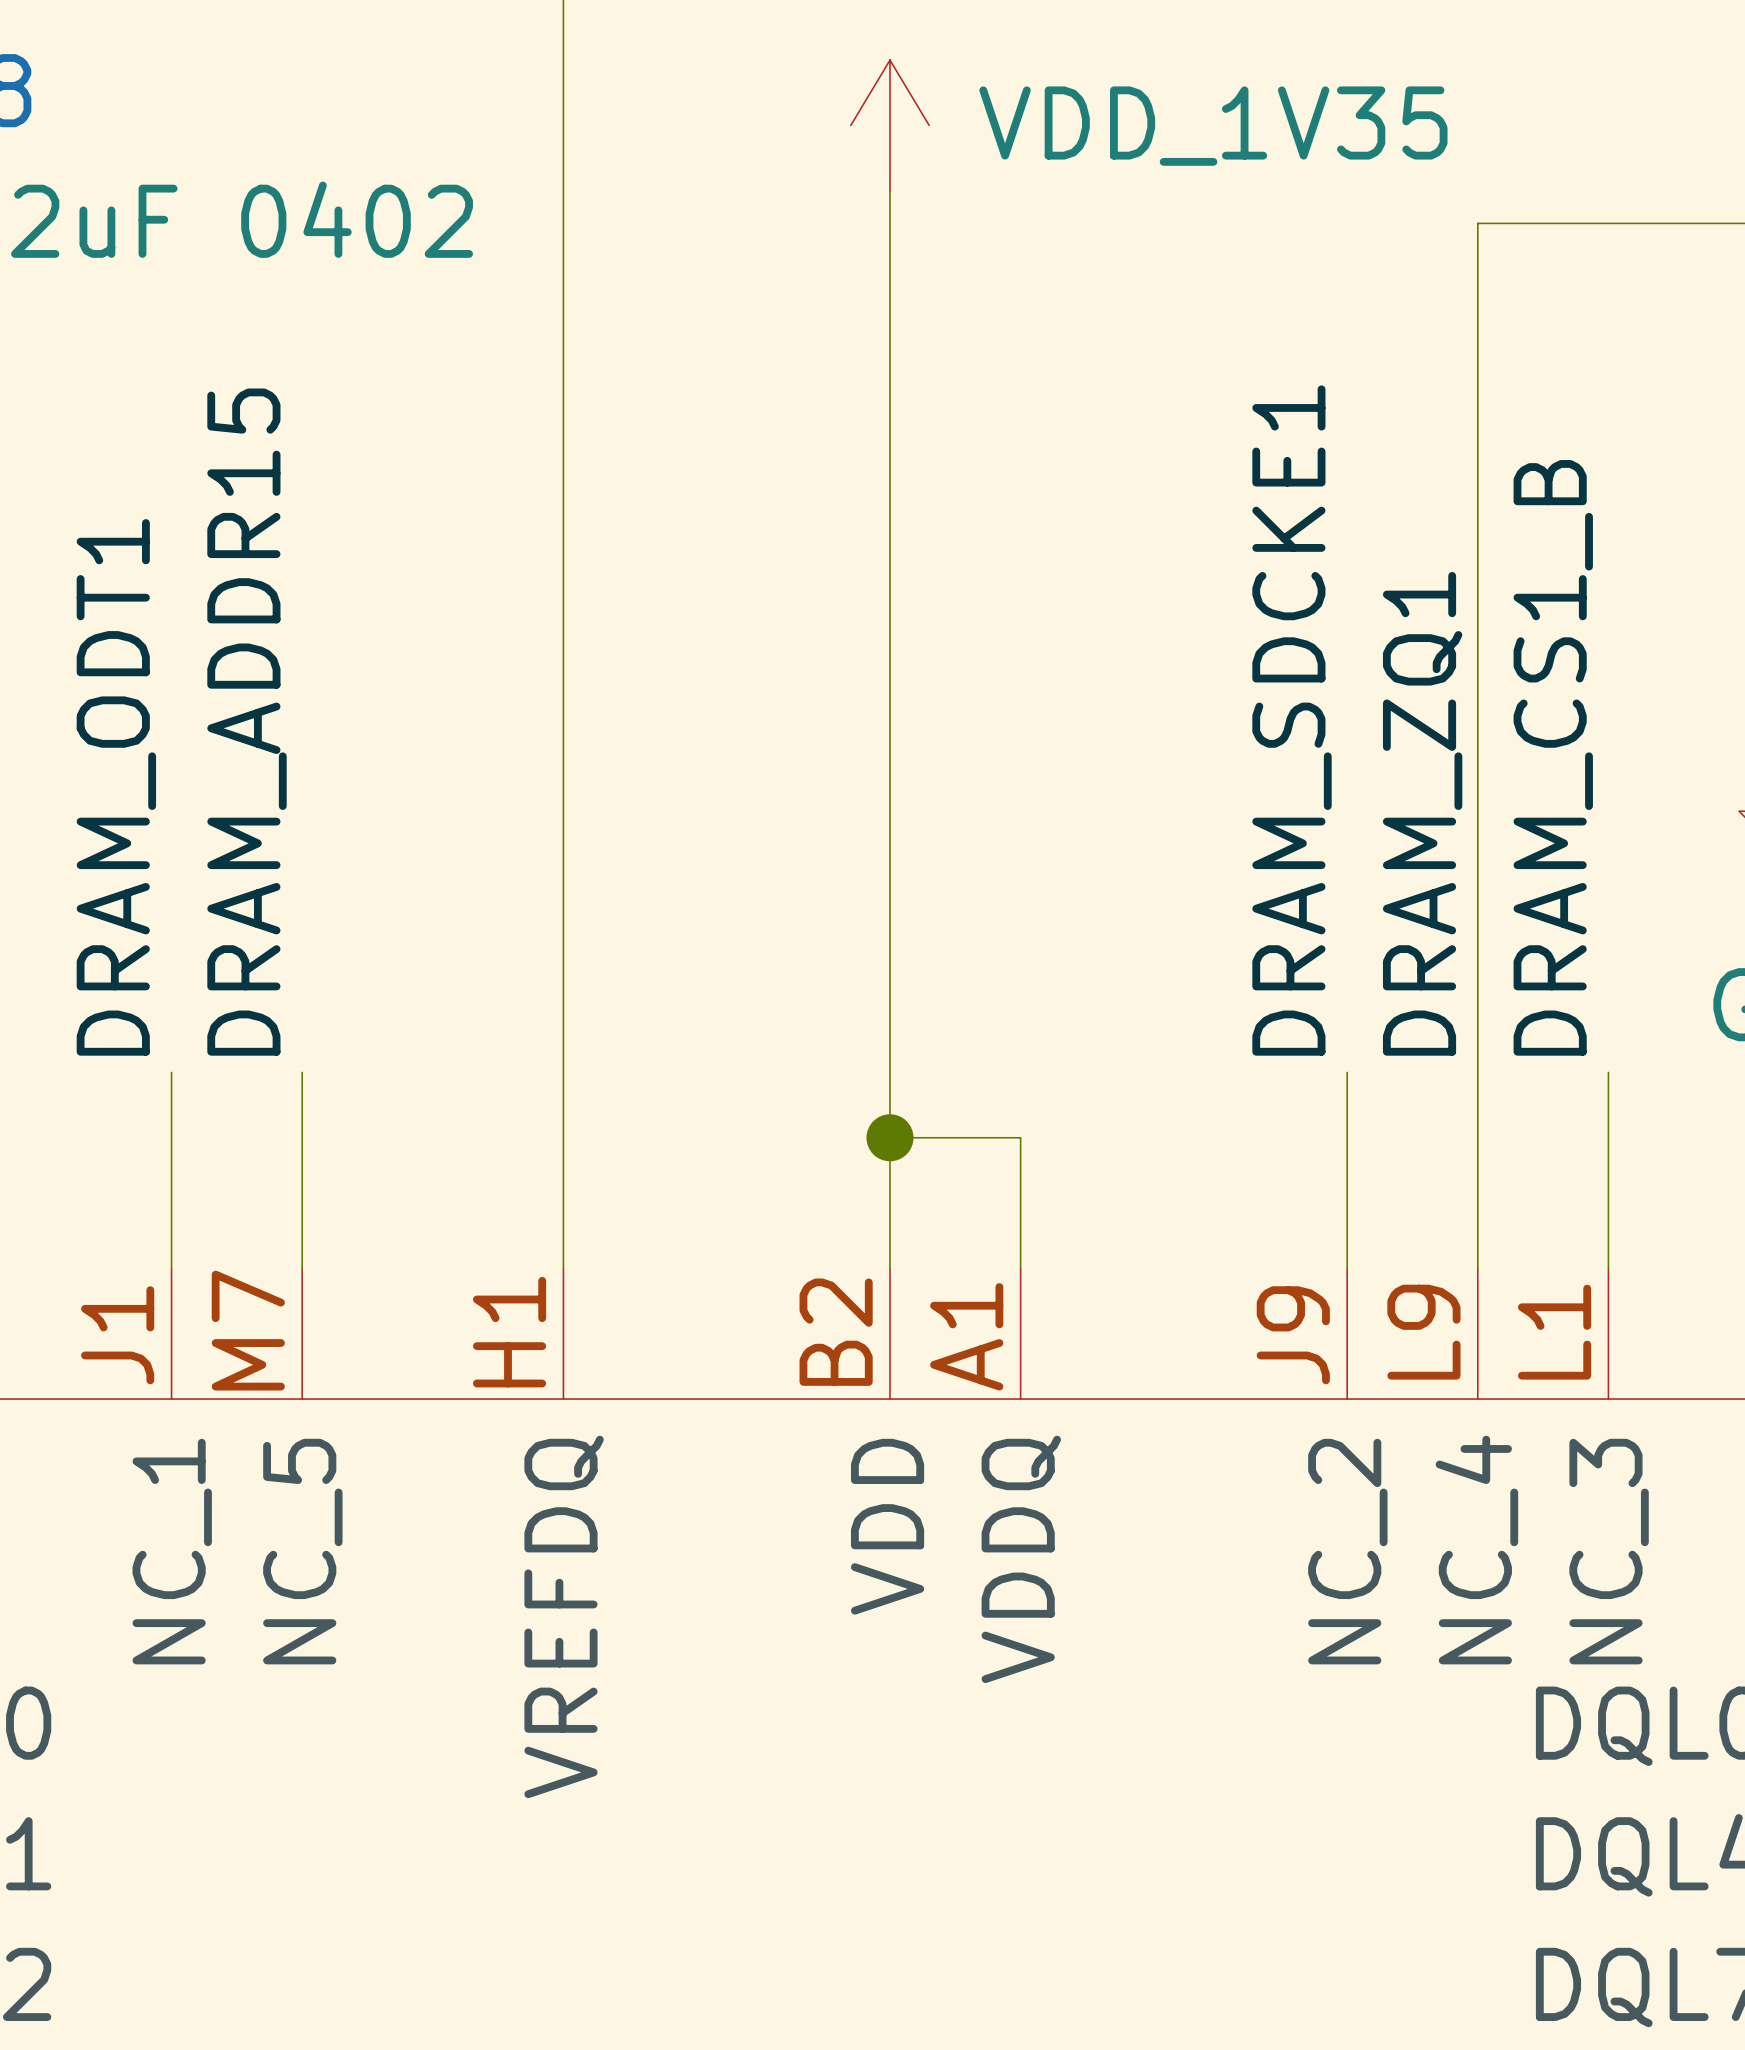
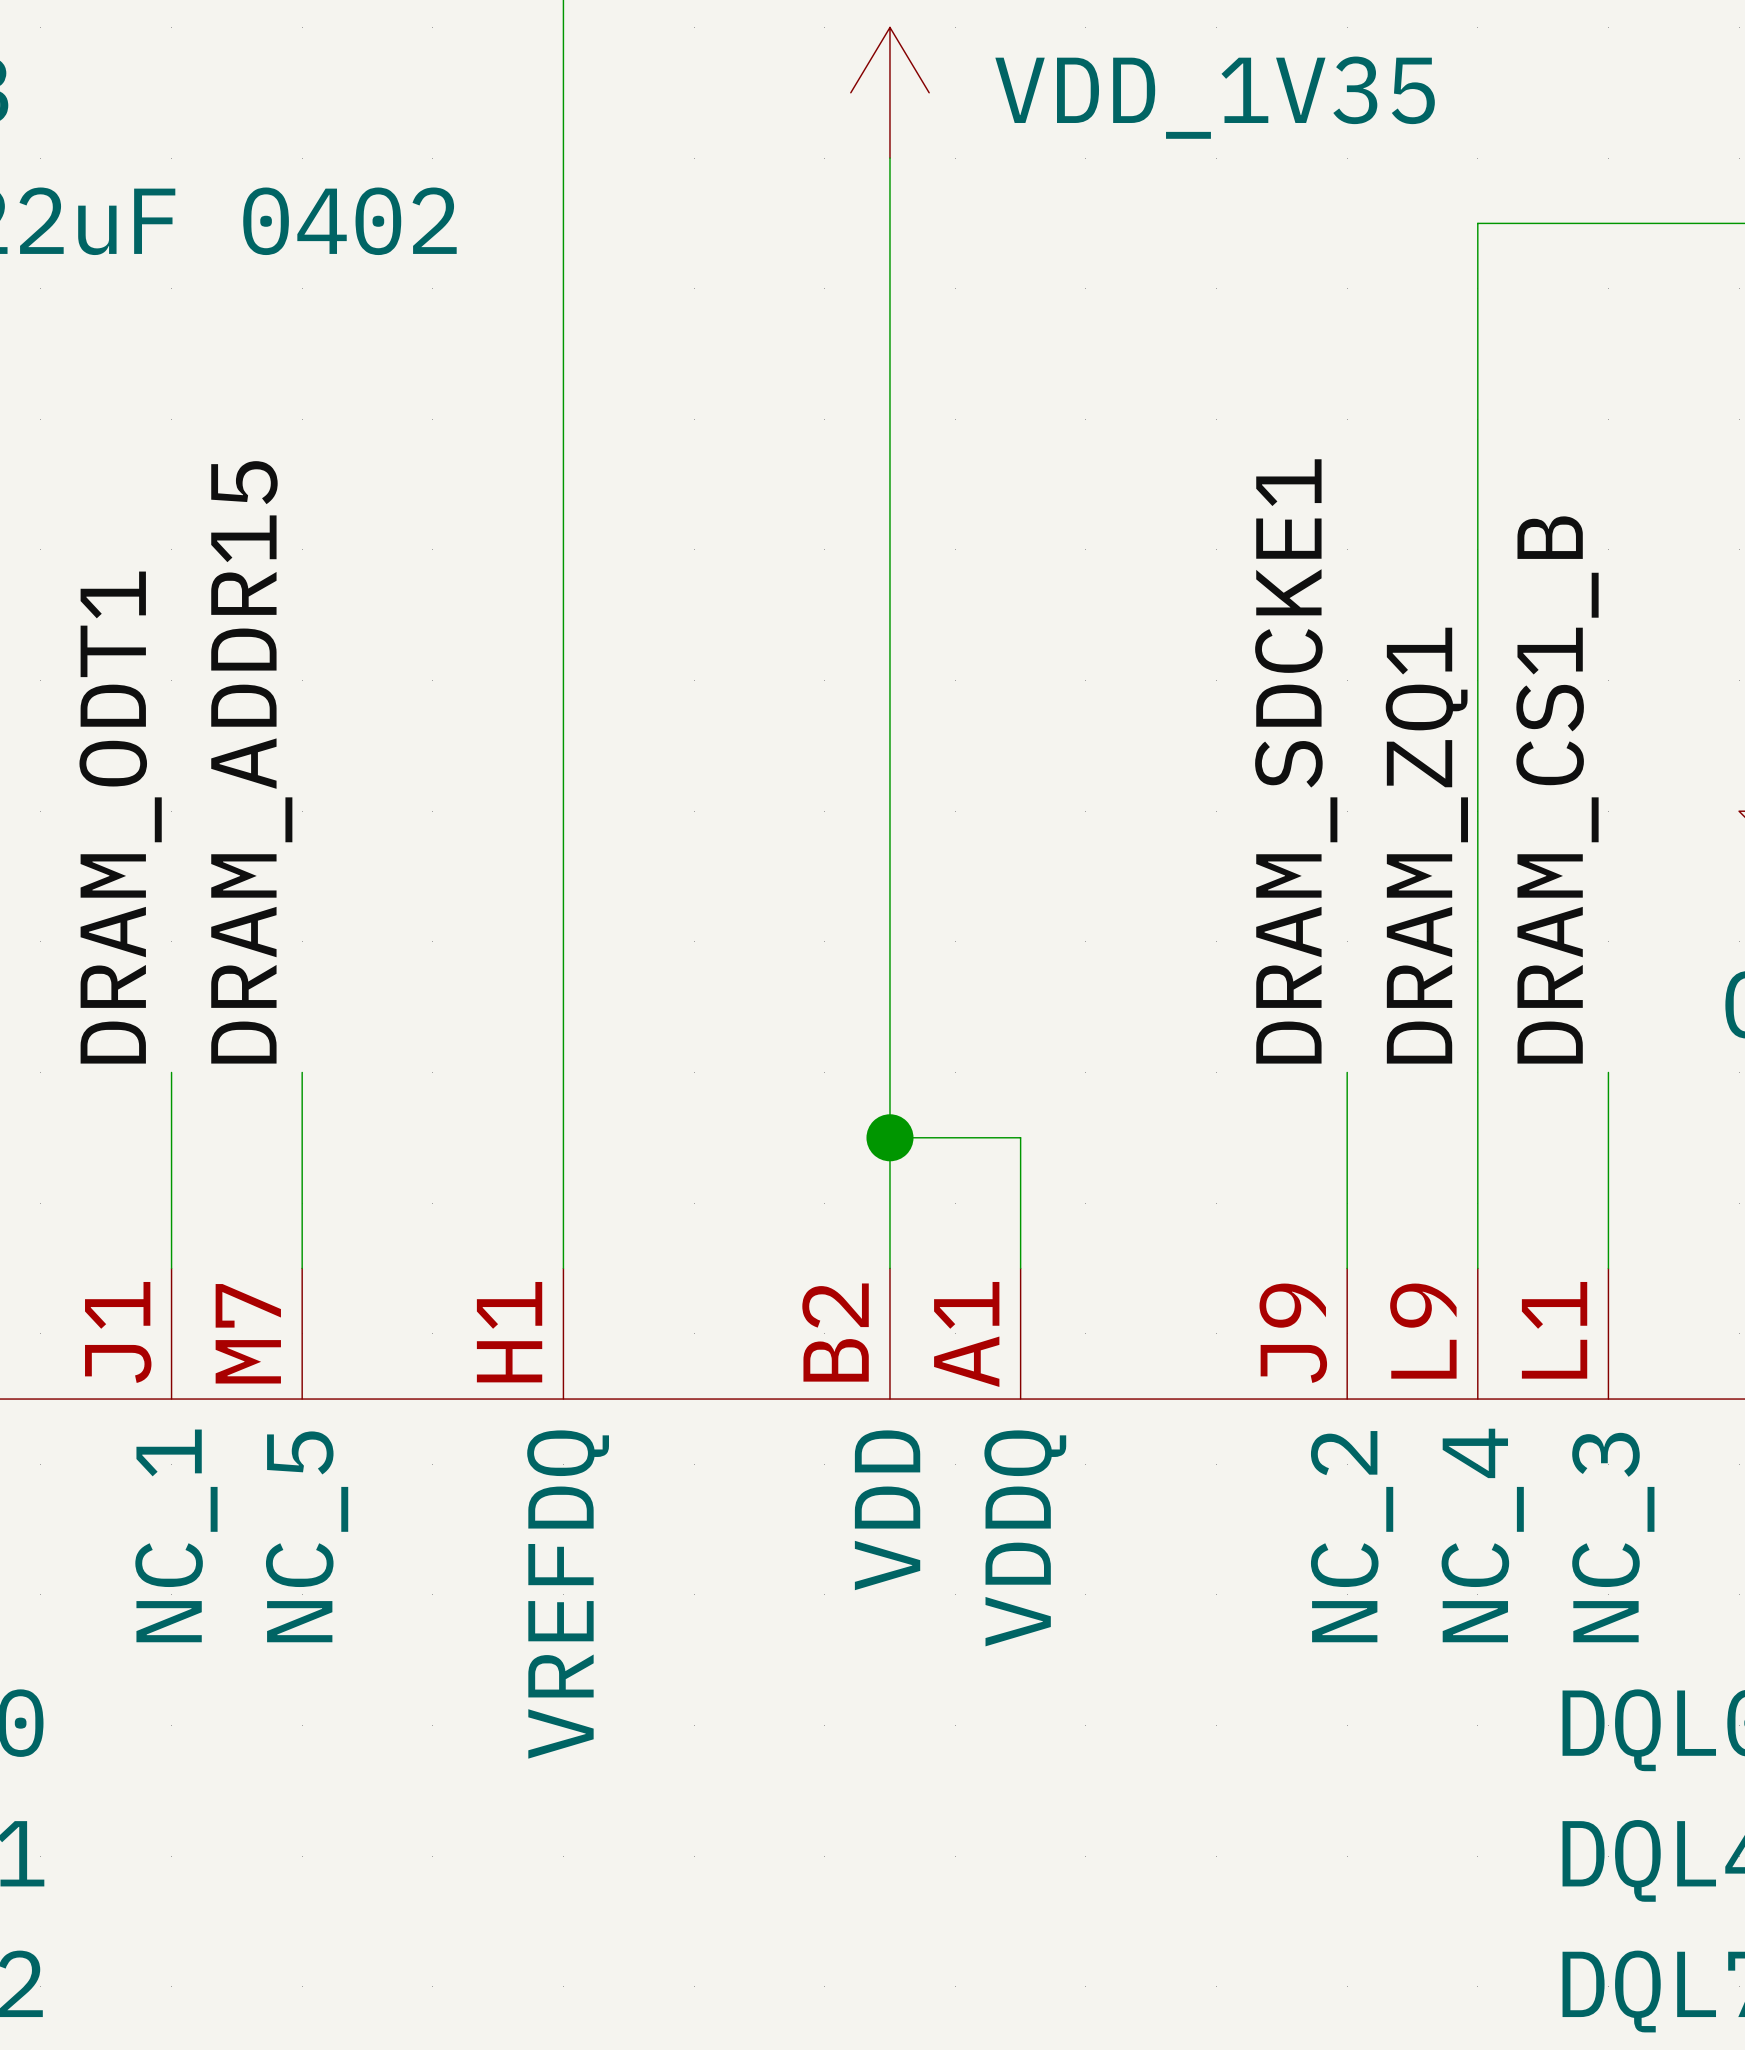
power symbol position: VDD_1V35 (889, 125) -> VDD_1V35 (889, 92)

